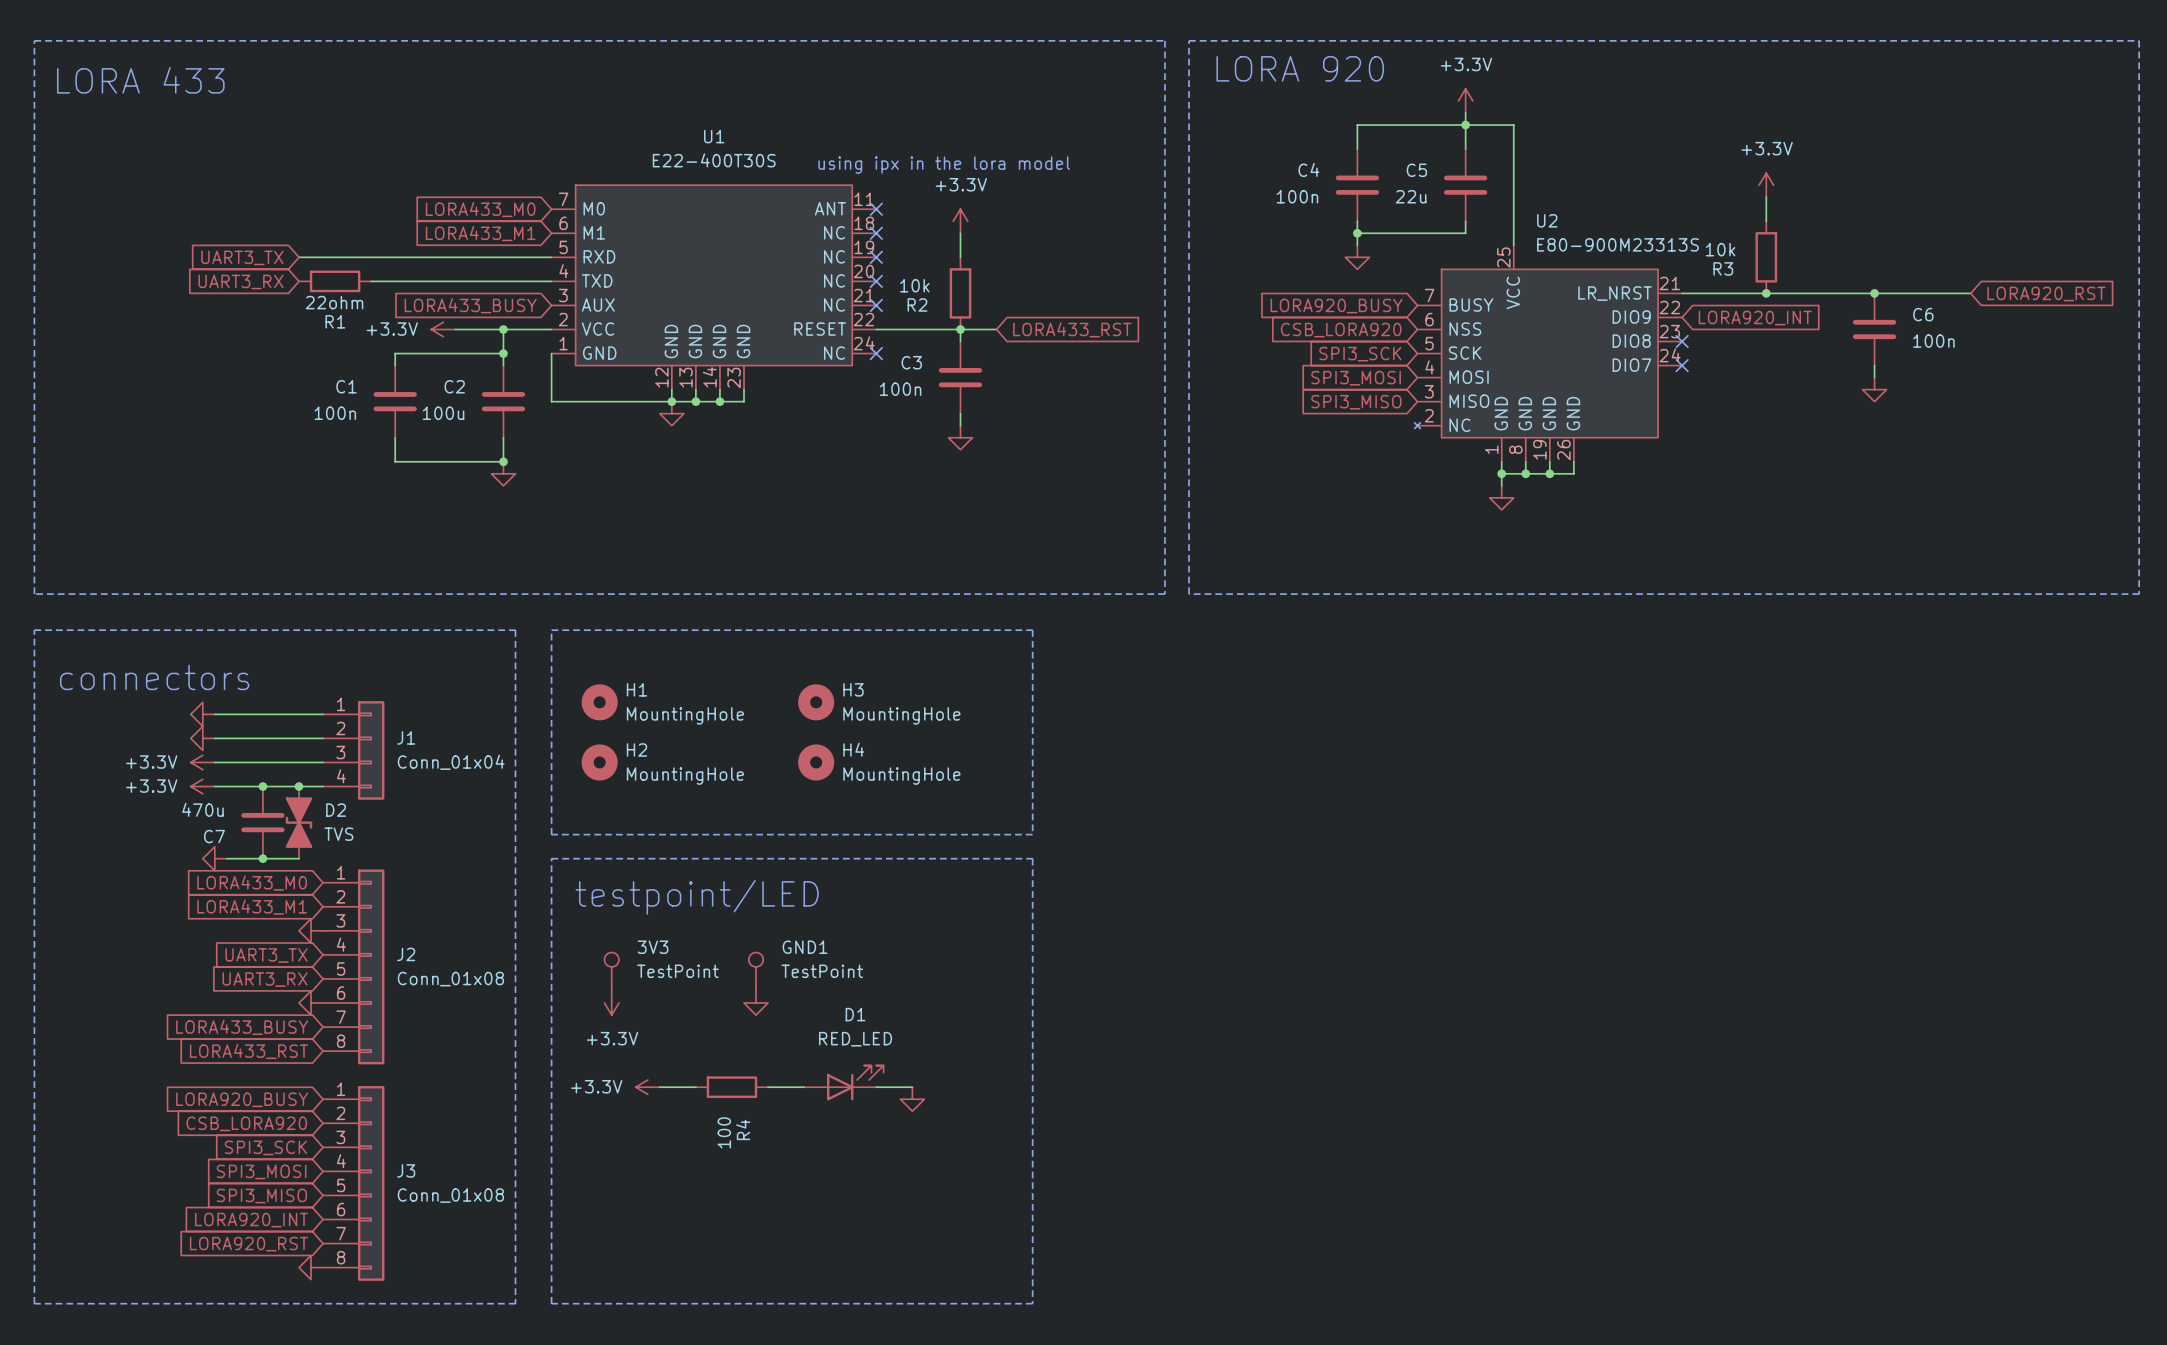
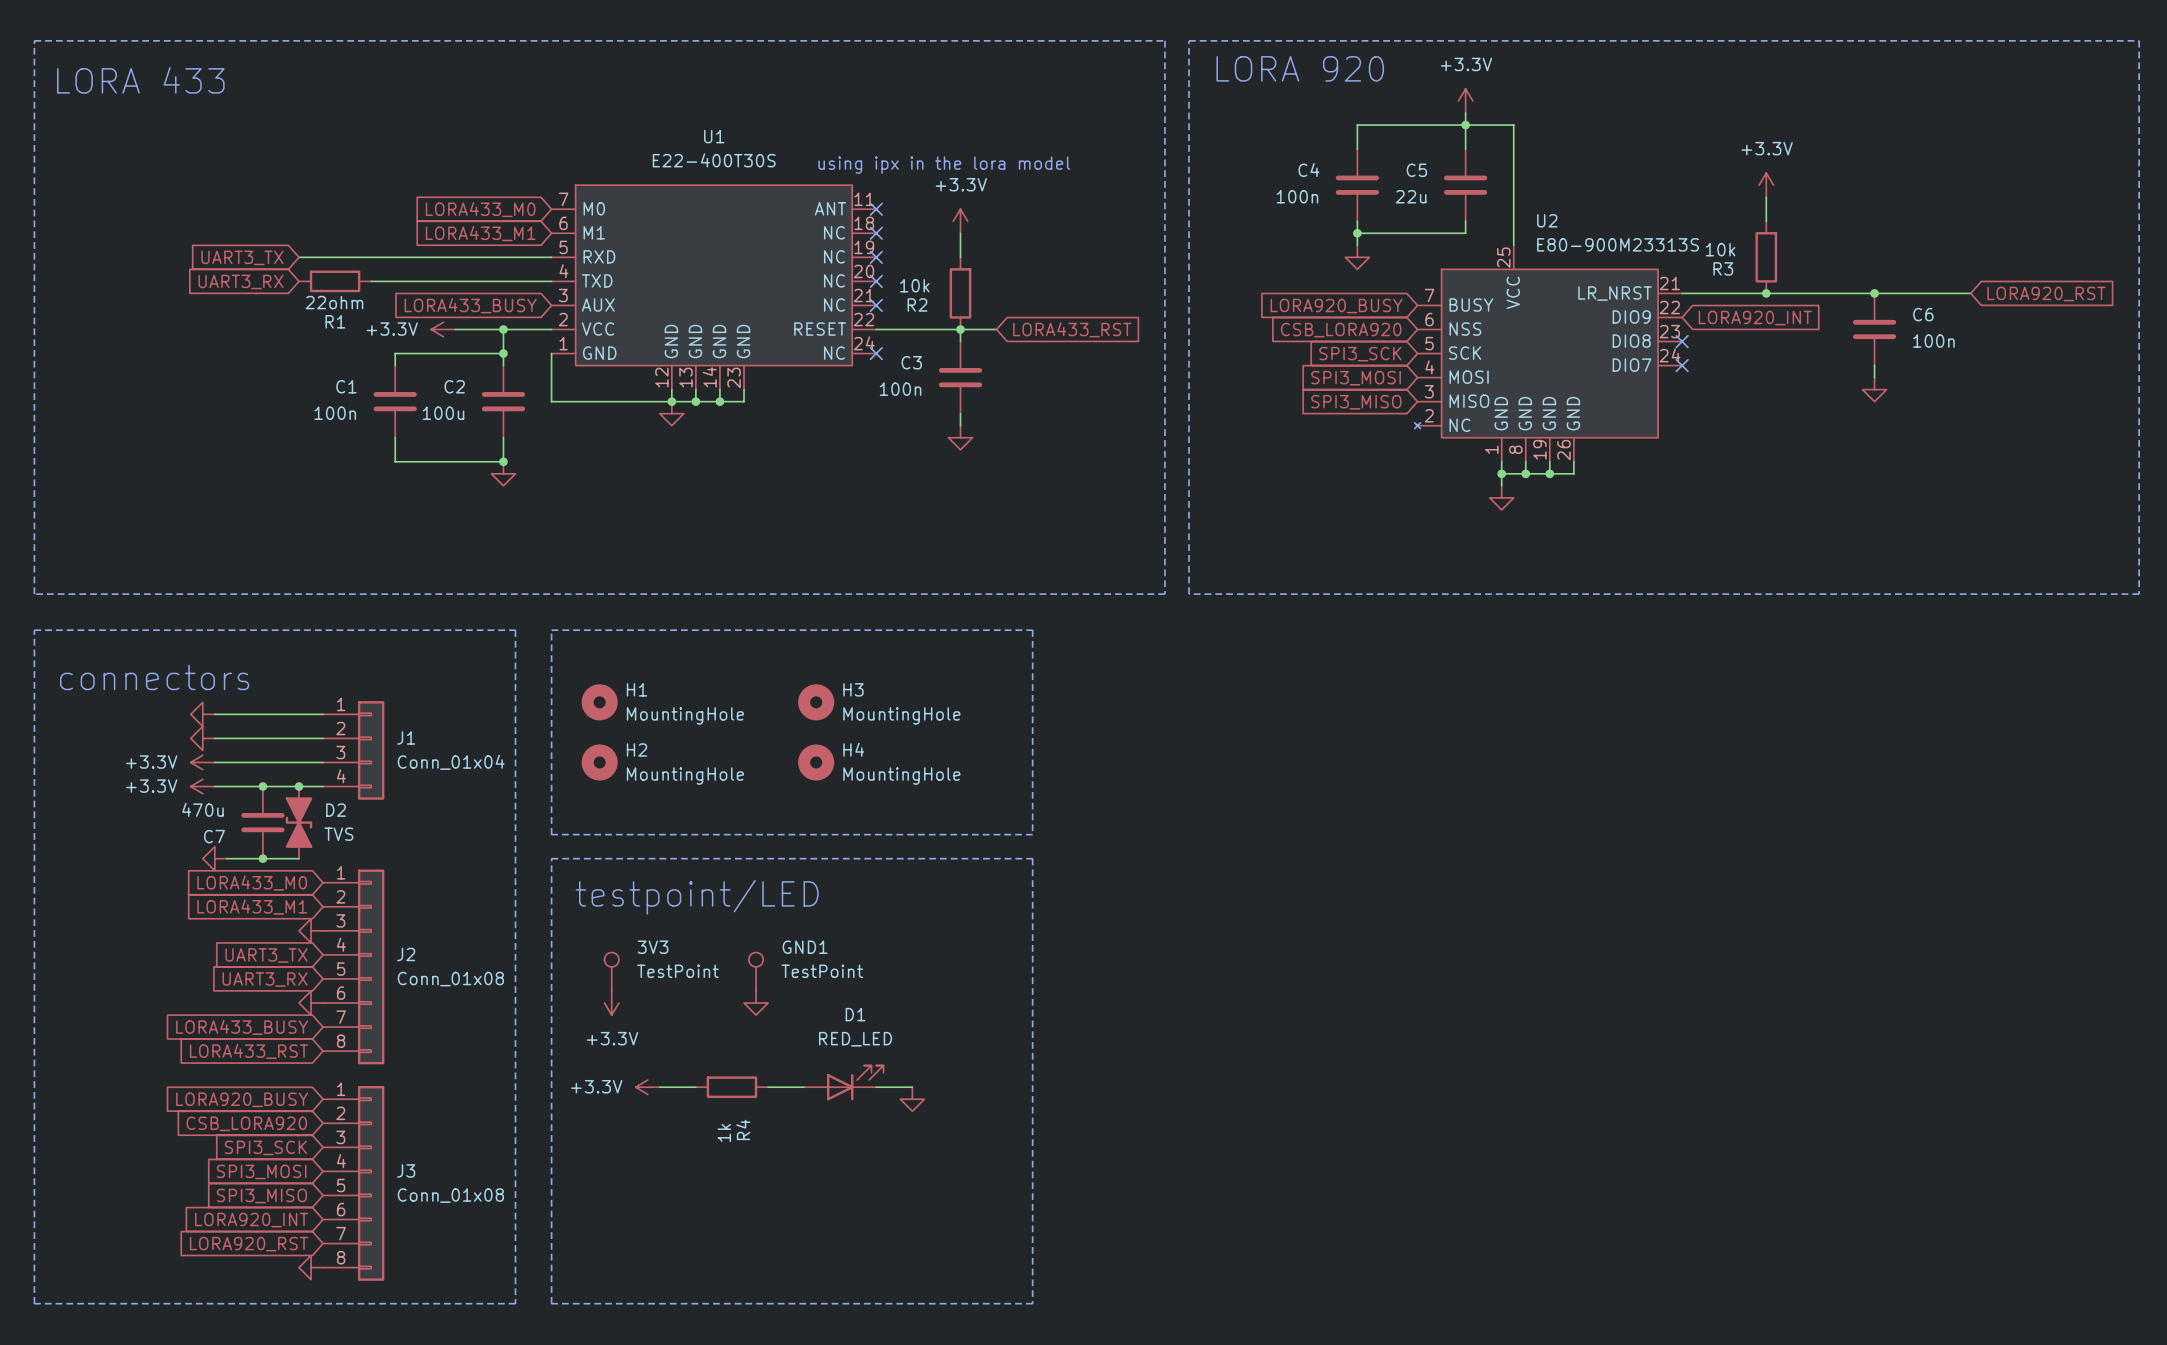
R4 value: 100 (724, 1132) -> 1k (724, 1132)

